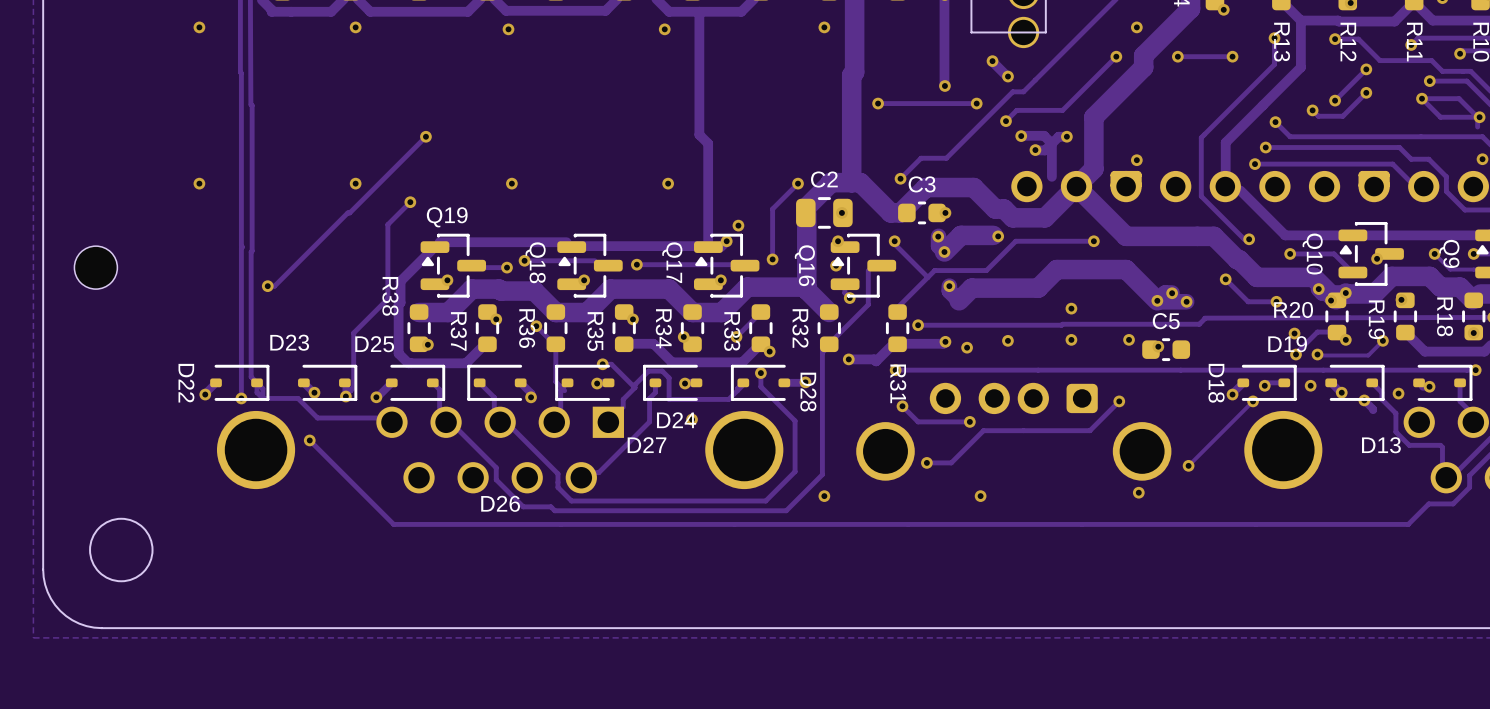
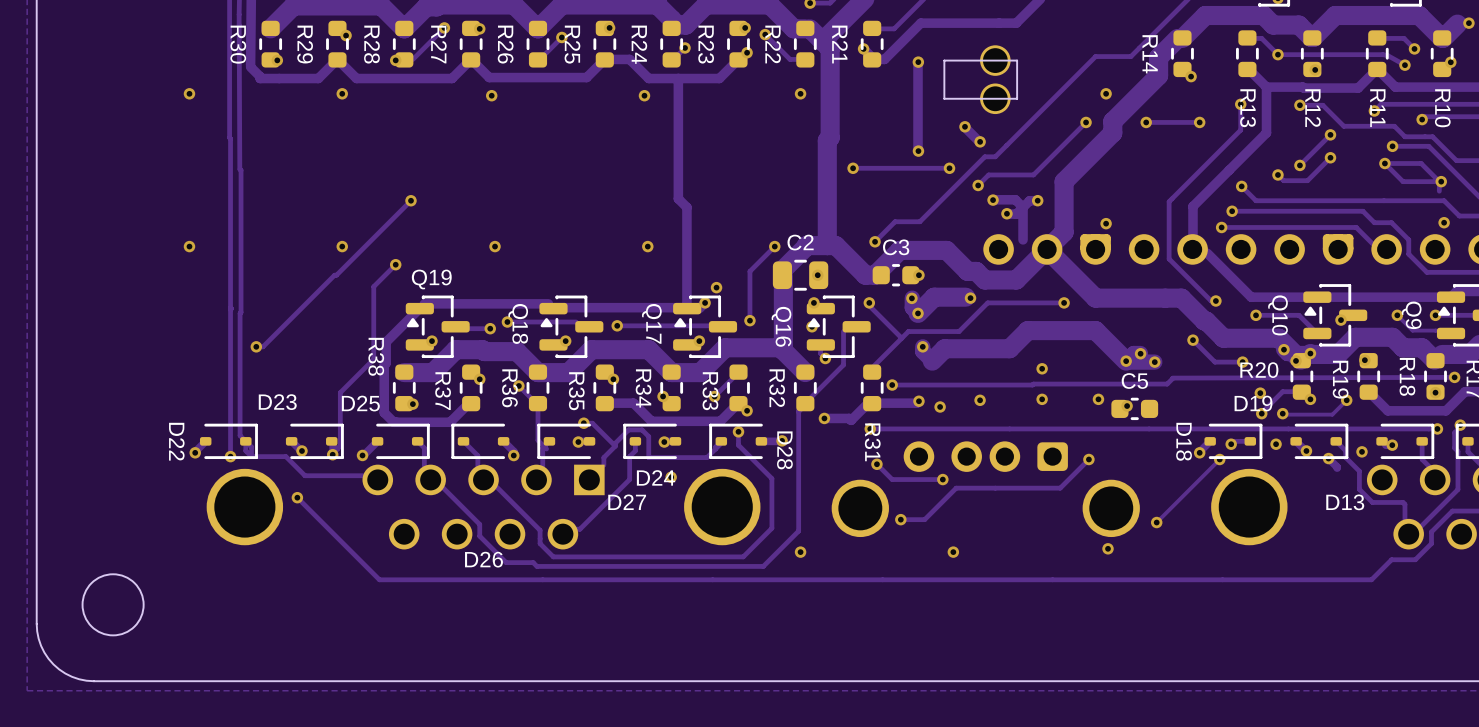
part: (95, 267) -> none

